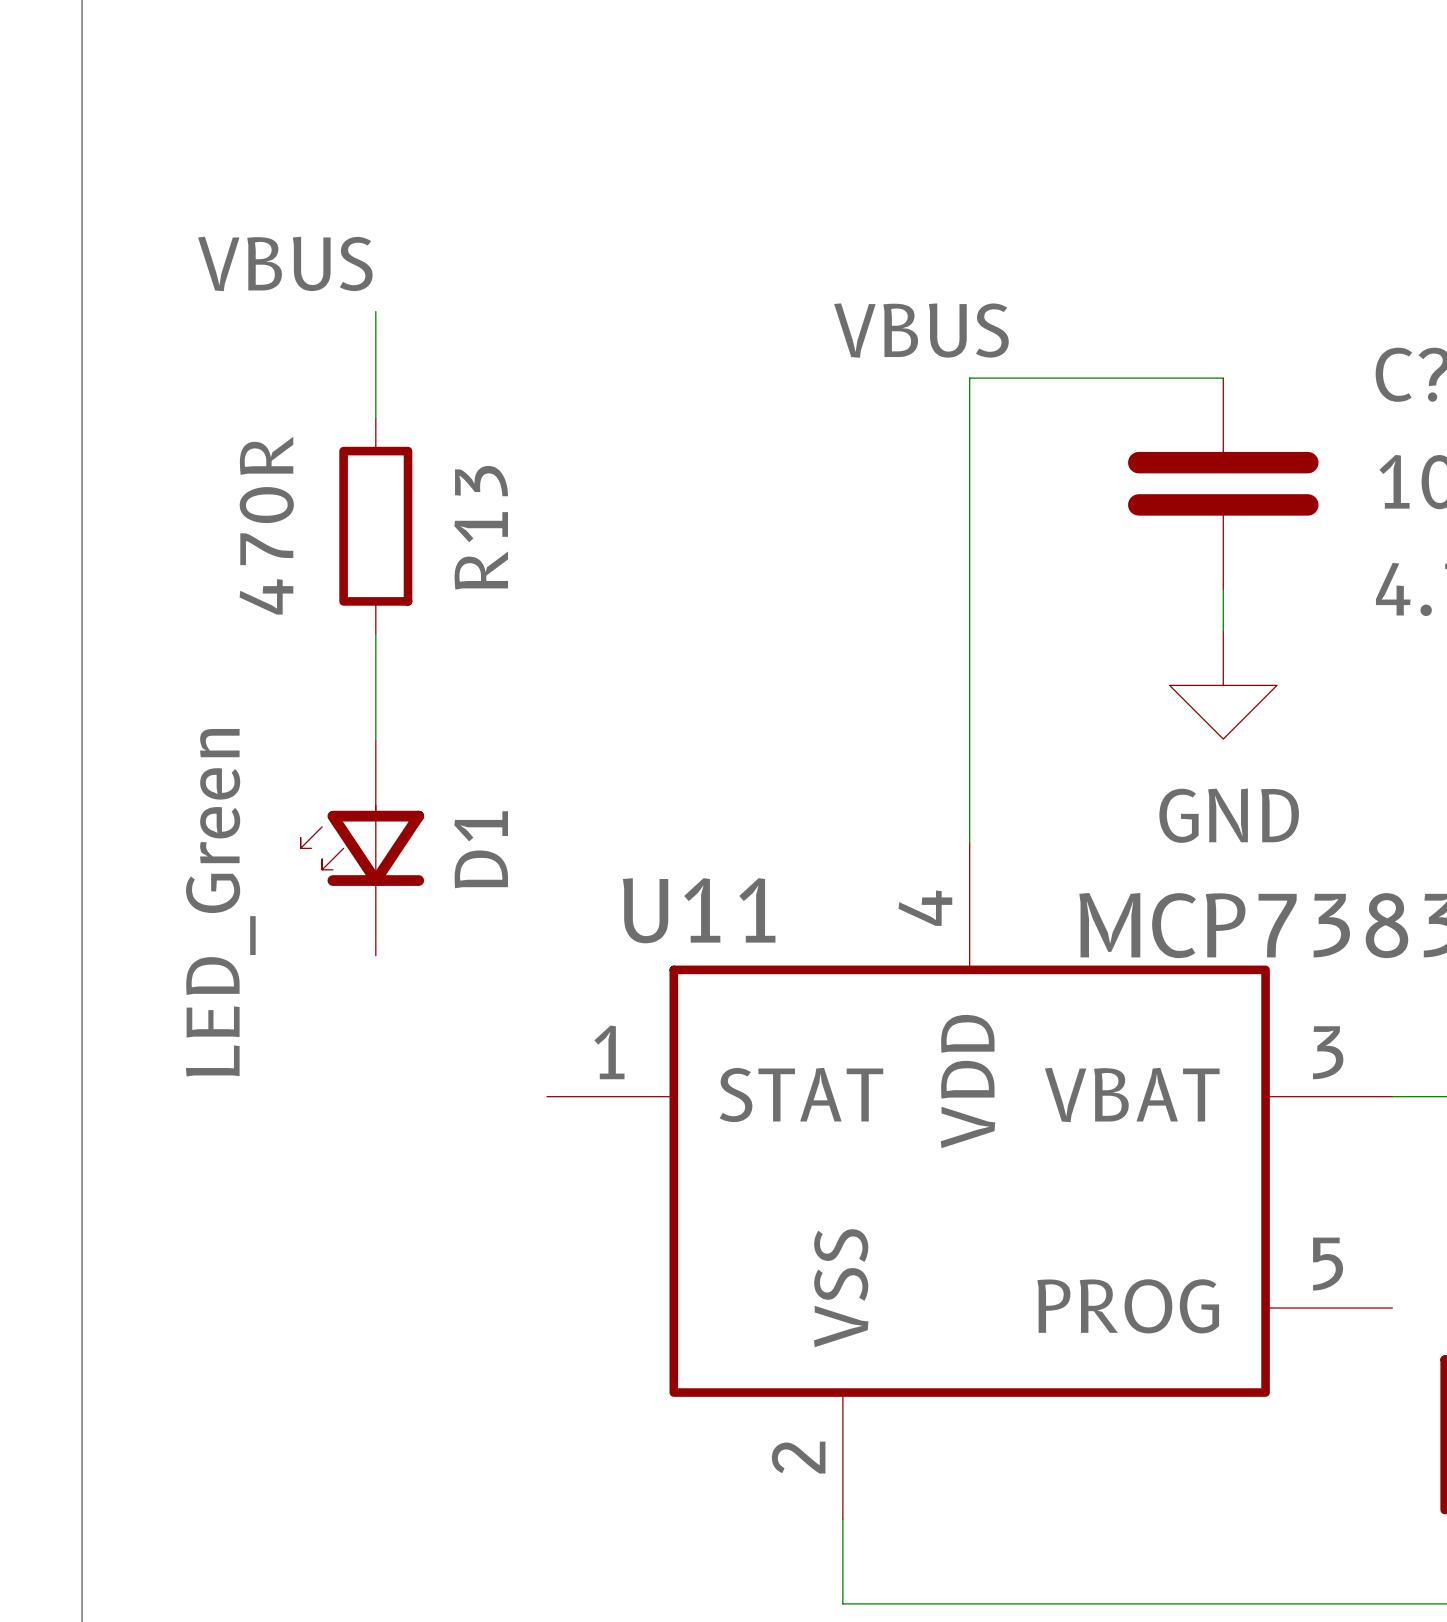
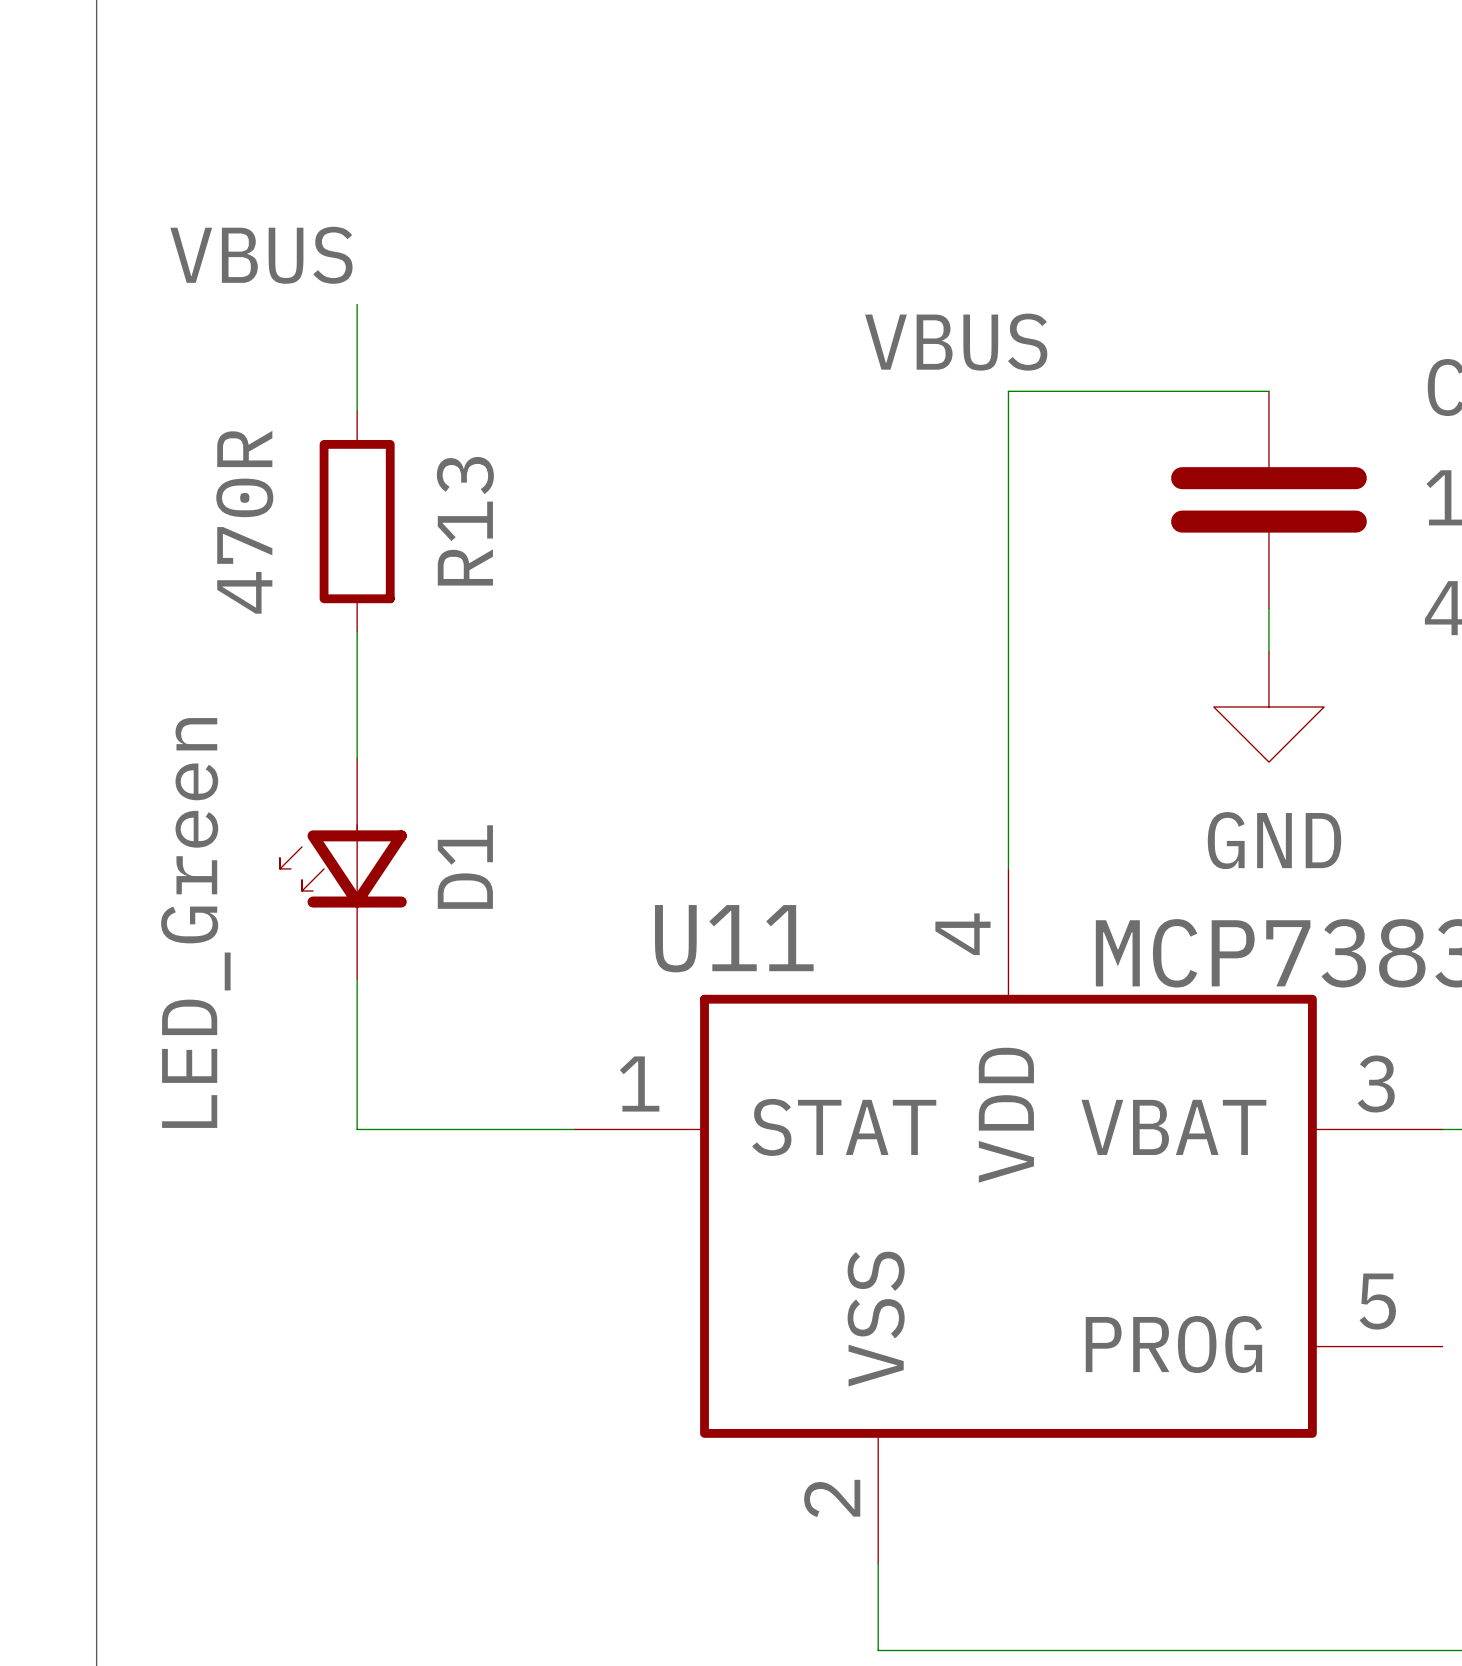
label position: VBUS (285, 263) -> VBUS (261, 255)
wire: none -> (357, 304) (357, 411)
wire: (375, 311) (375, 418) -> none
R13 position: (375, 526) -> (357, 521)
wire: none -> (357, 631) (357, 758)
wire: (375, 633) (375, 740) -> none
D1 position: (362, 848) -> (343, 868)
wire: none -> (357, 979) (357, 1129) (574, 1129)

